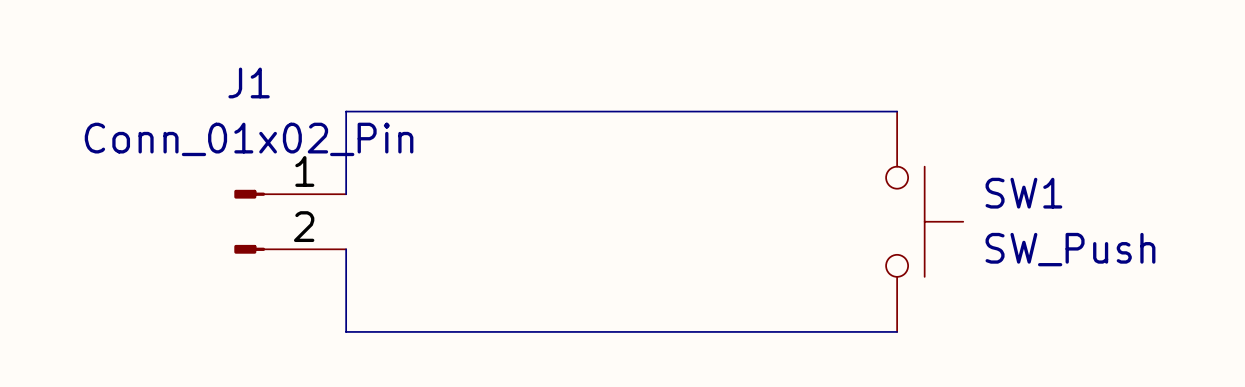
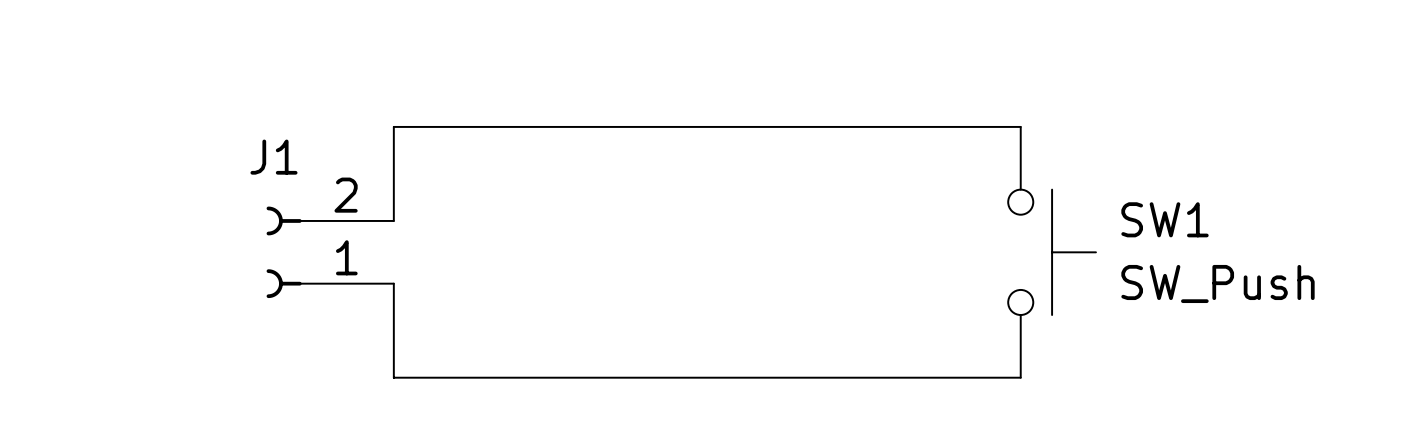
J1 name position: J1 (249, 82) -> J1 (273, 157)
J1 value: Conn_01x02_Pin (249, 139) -> none
J1 symbol: [234, 189, 347, 254] -> [266, 206, 394, 299]

